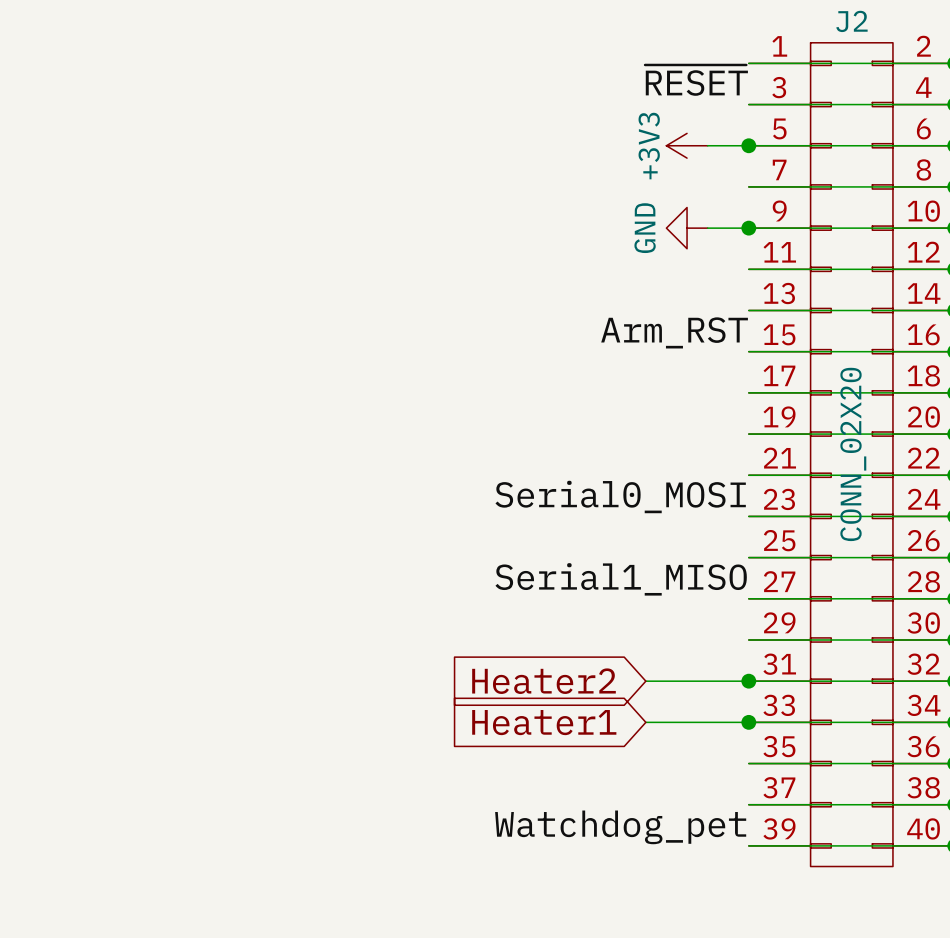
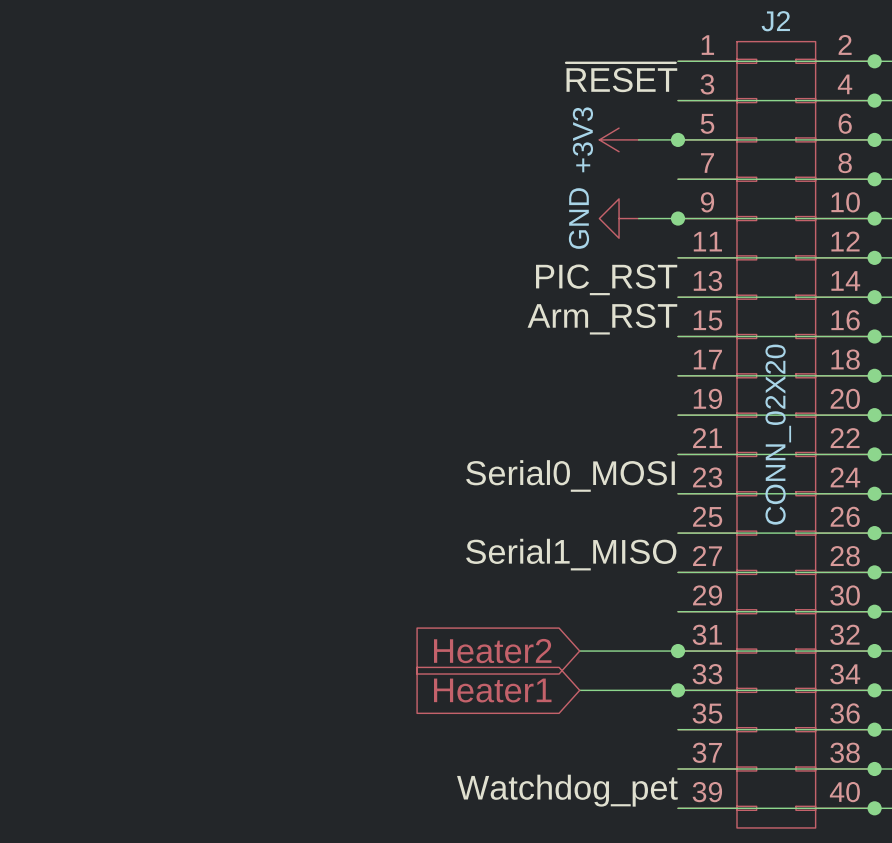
label: none -> PIC_RST (606, 279)

